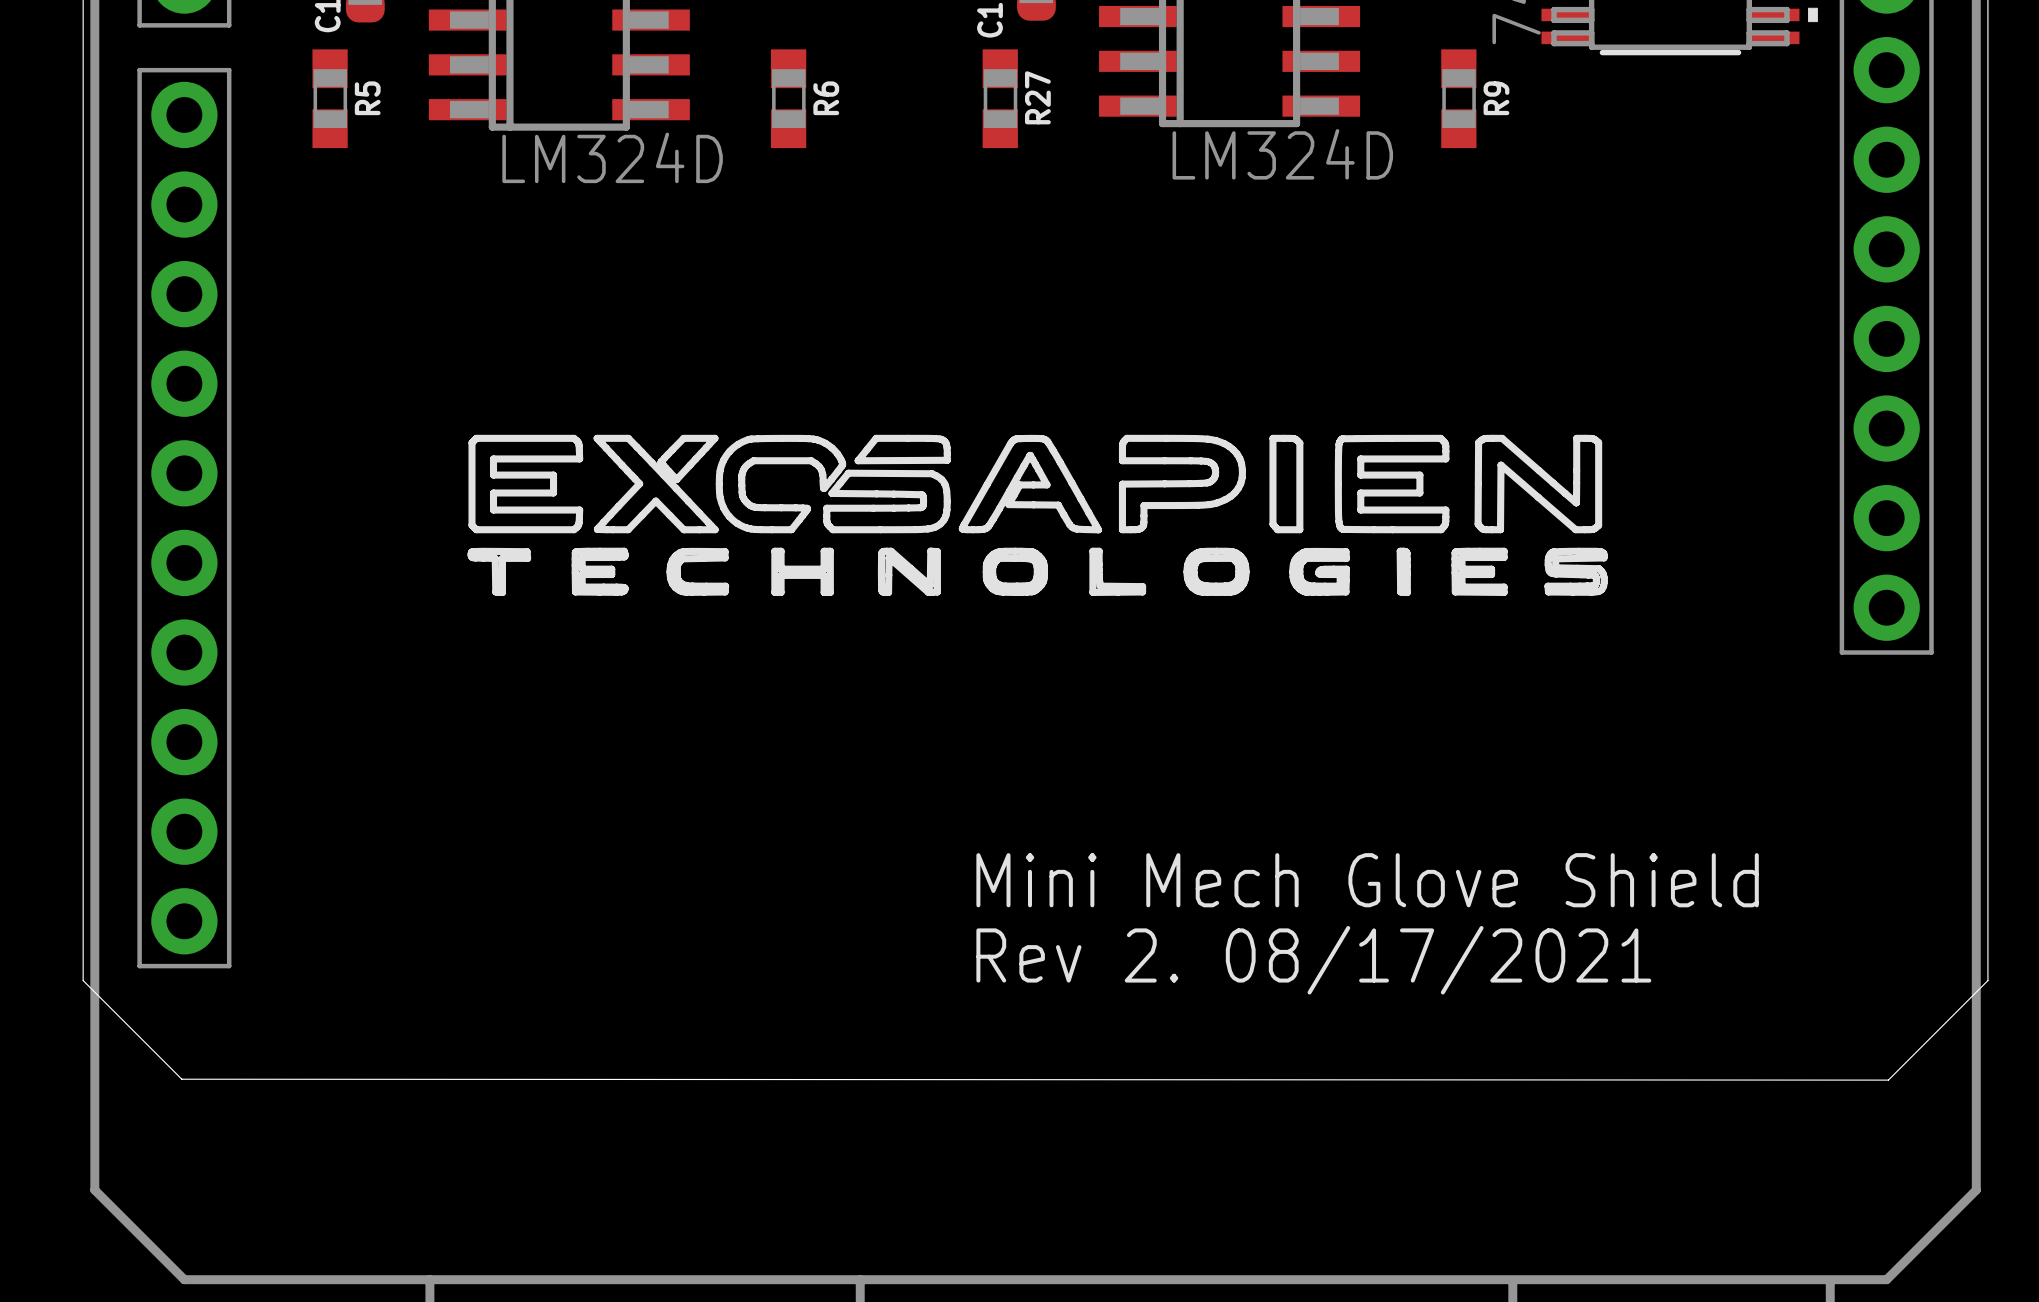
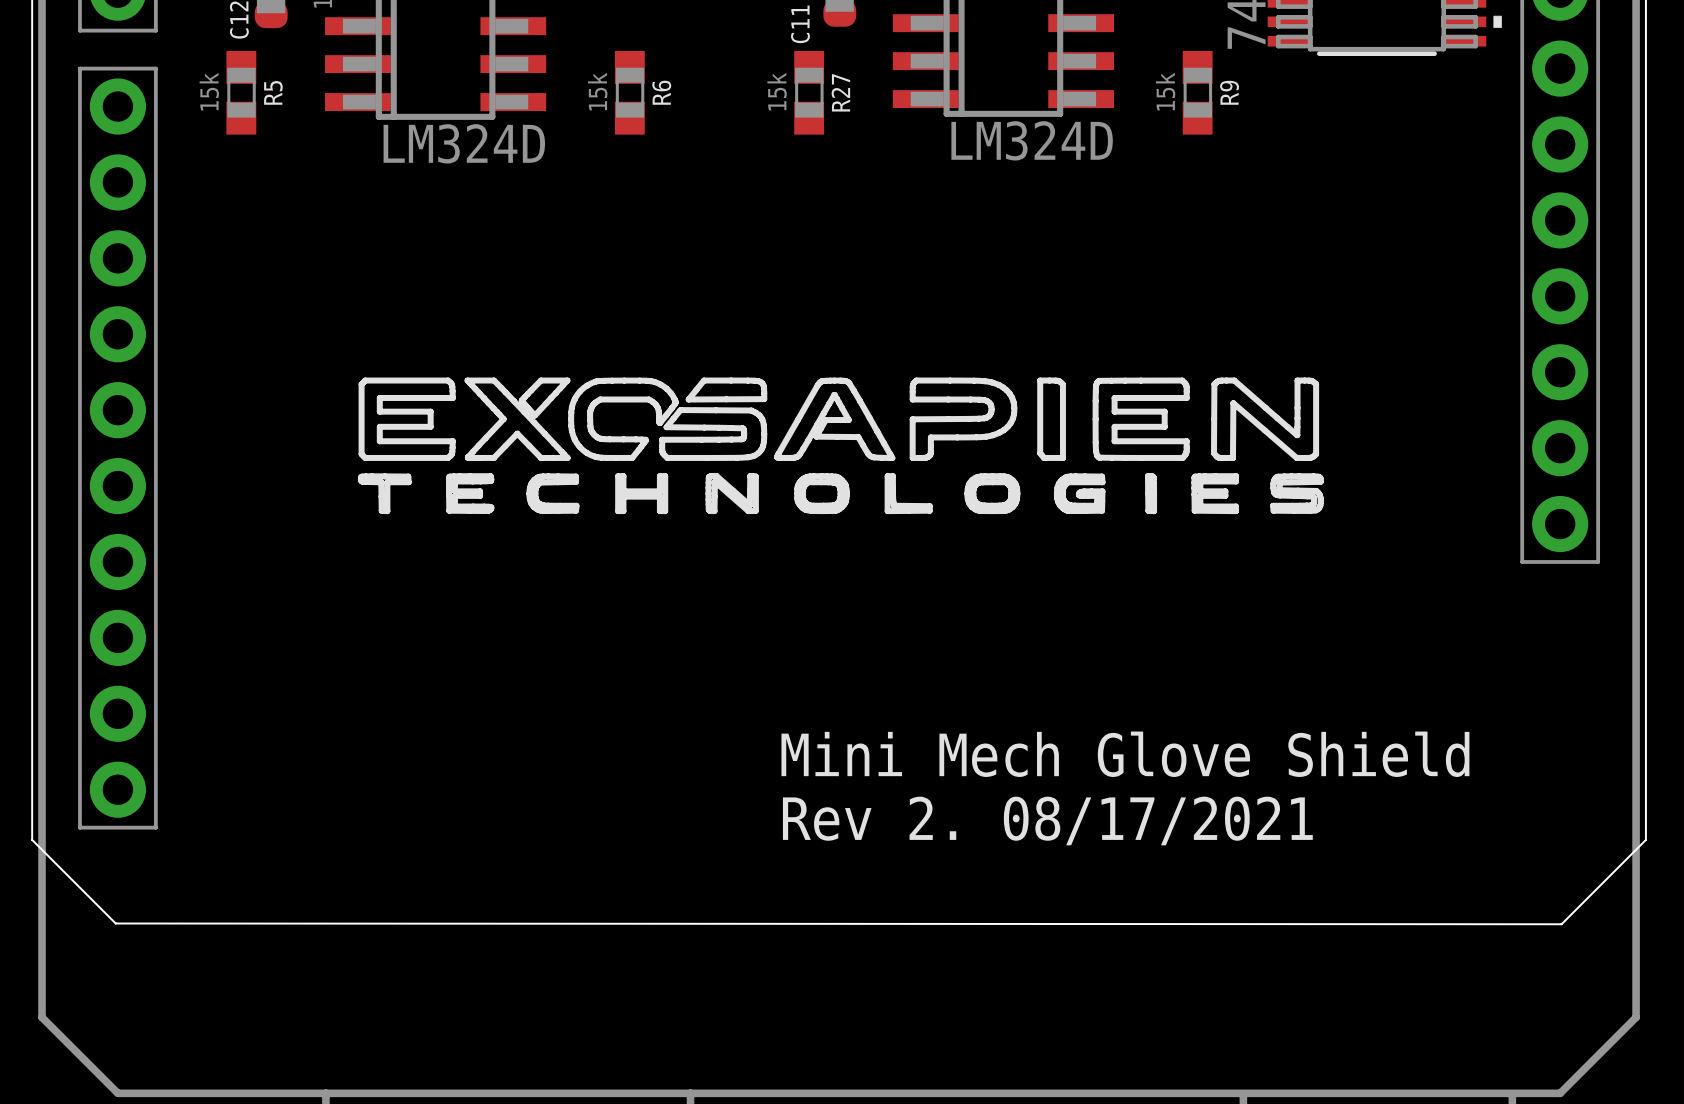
R5 value: none -> 15k (209, 91)
R6 value: none -> 15k (597, 91)
R27 value: none -> 15k (777, 91)
R9 value: none -> 15k (1165, 91)

